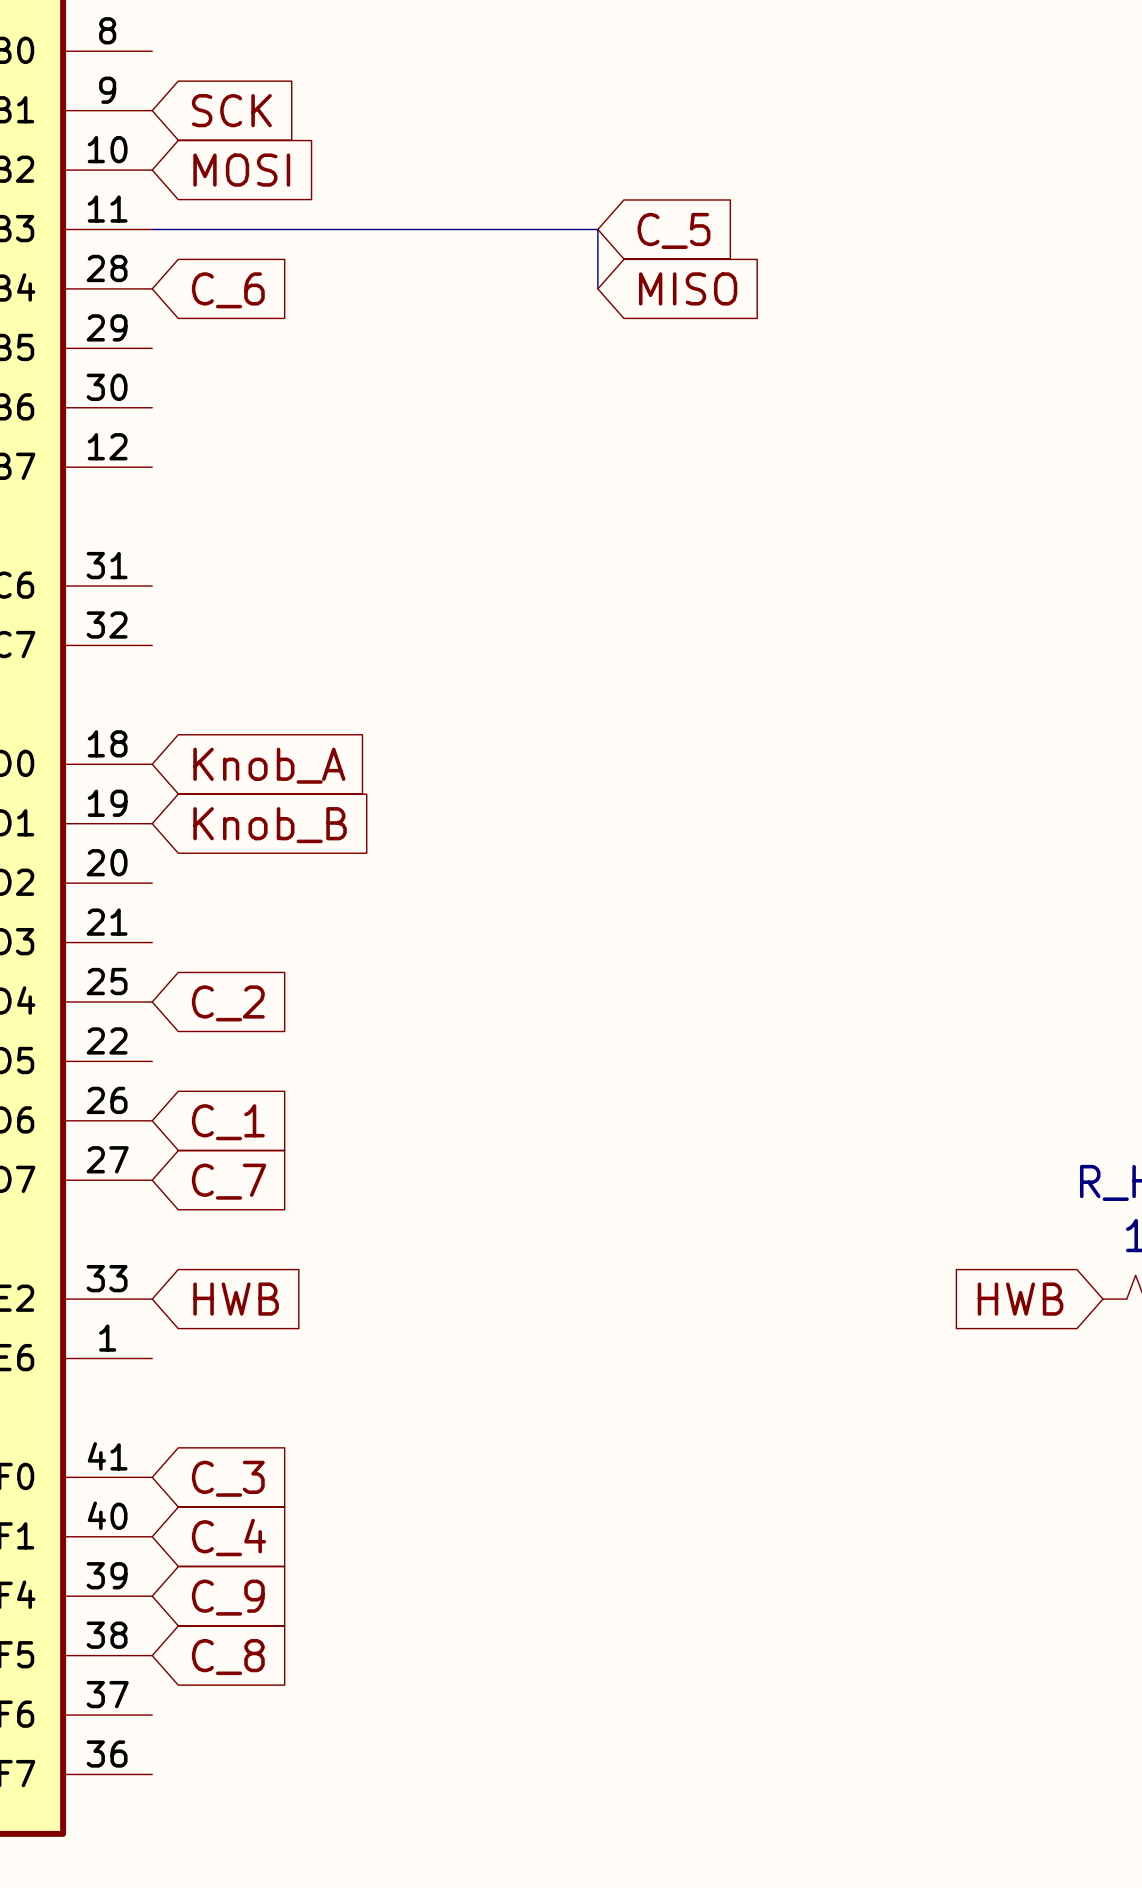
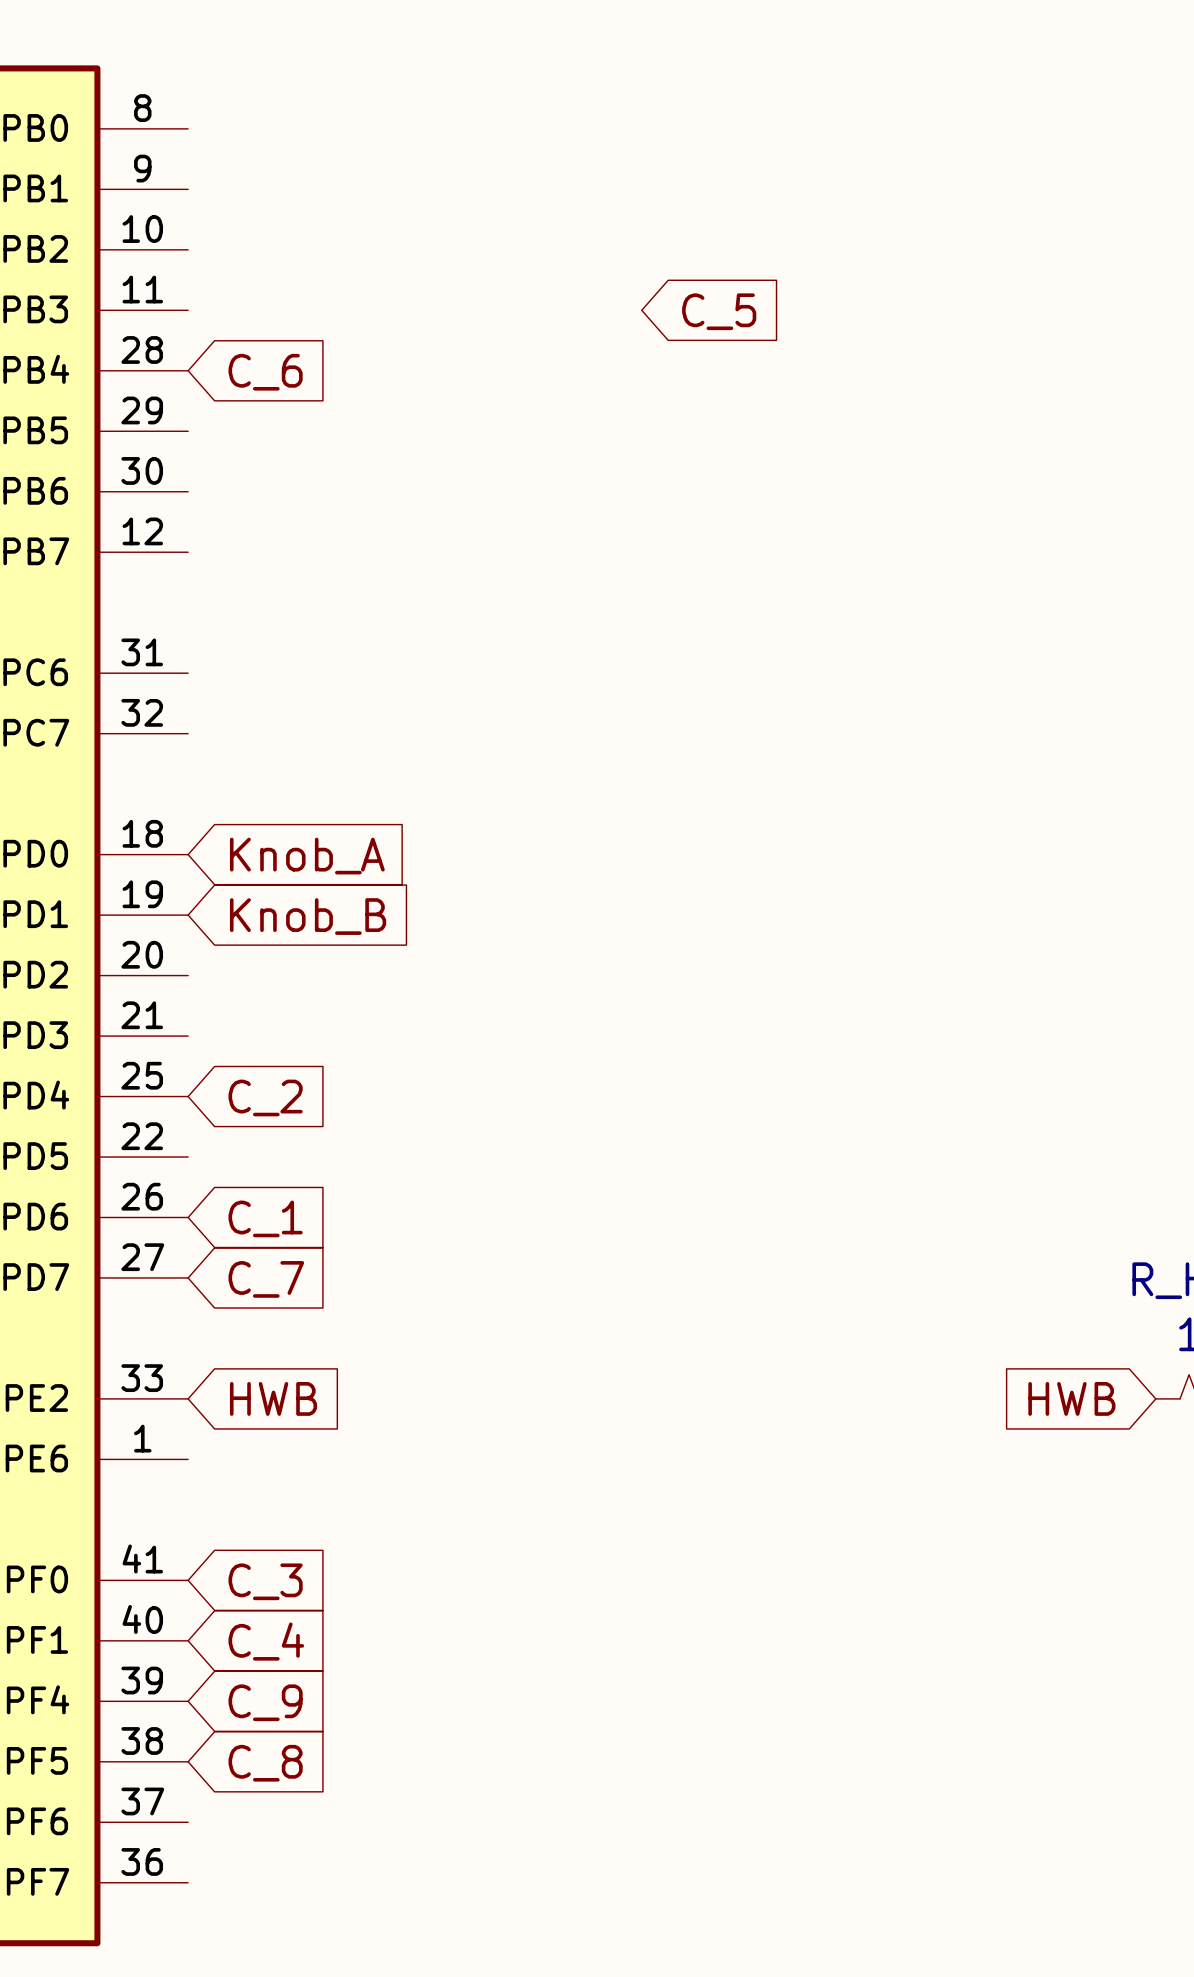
global label: SCK (231, 110) -> none
global label: MOSI (241, 170) -> none
wire: (152, 229) (597, 229) (597, 288) -> none
global label: MISO (688, 288) -> none

